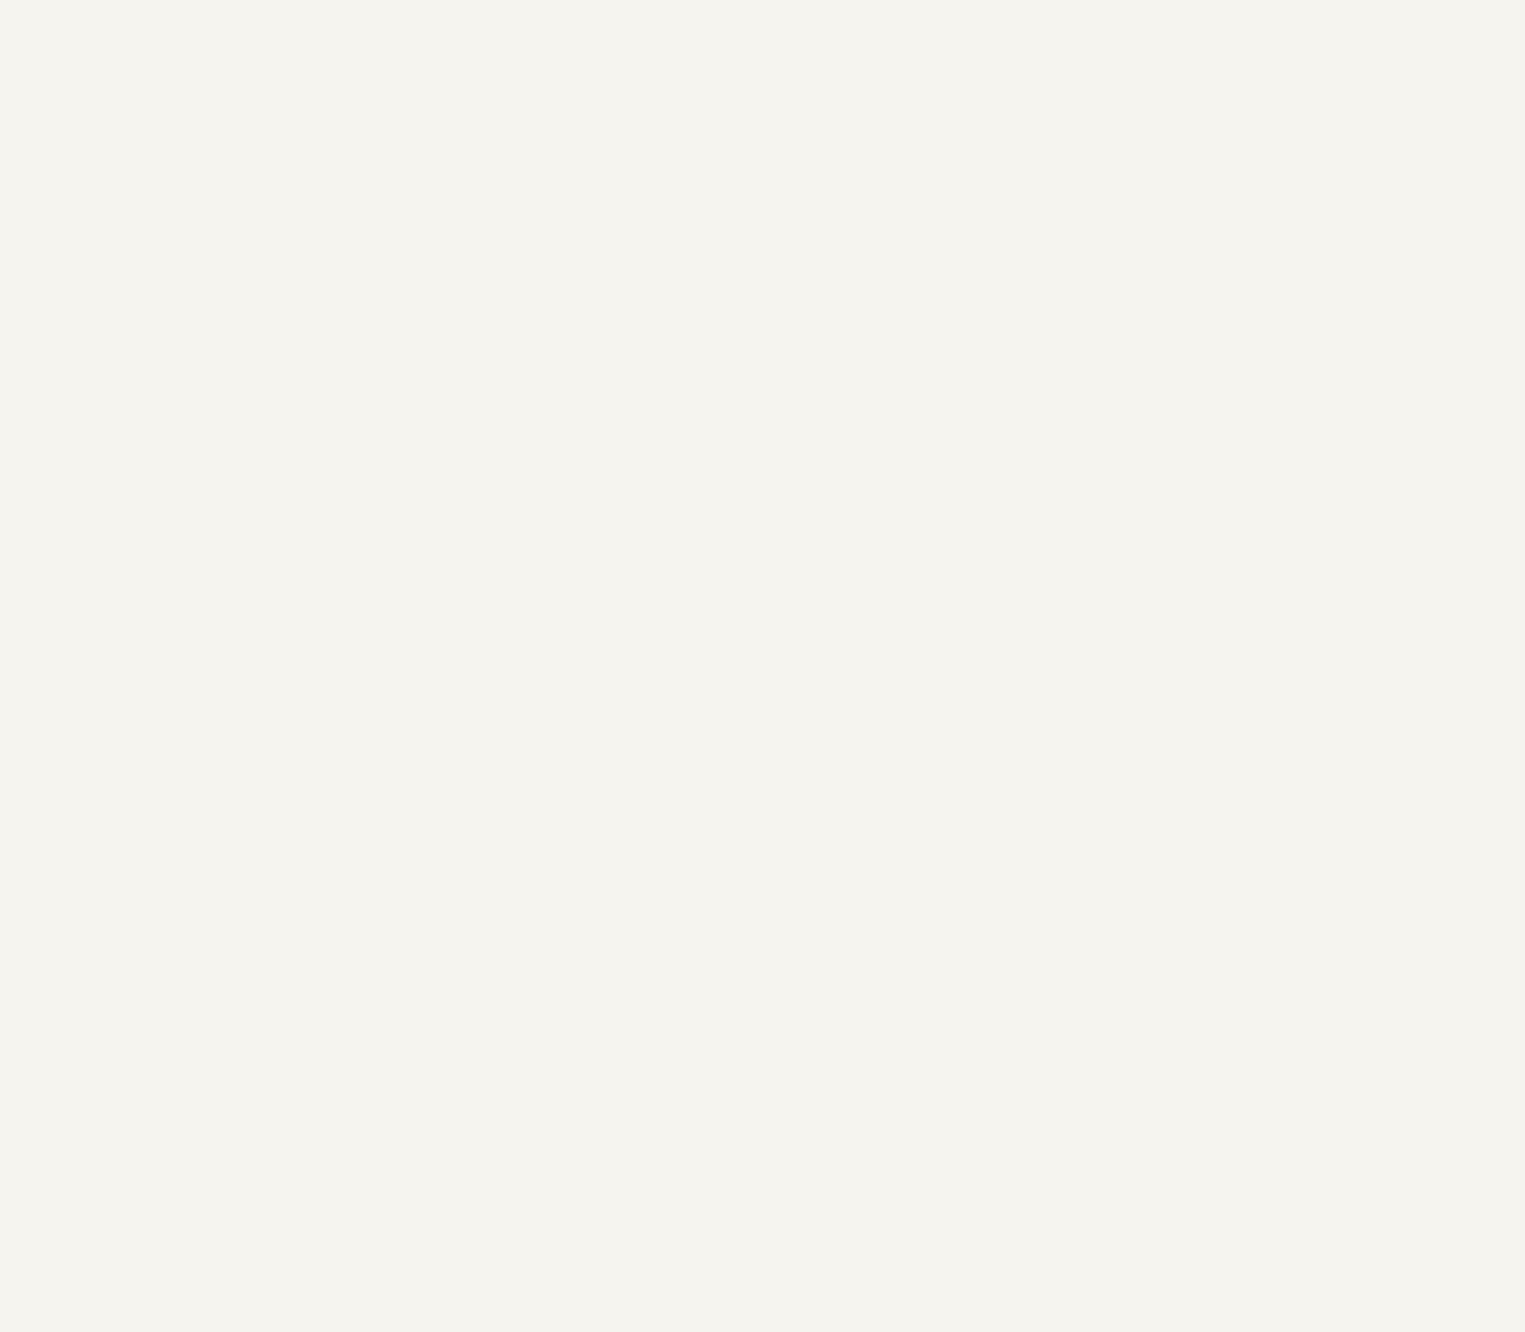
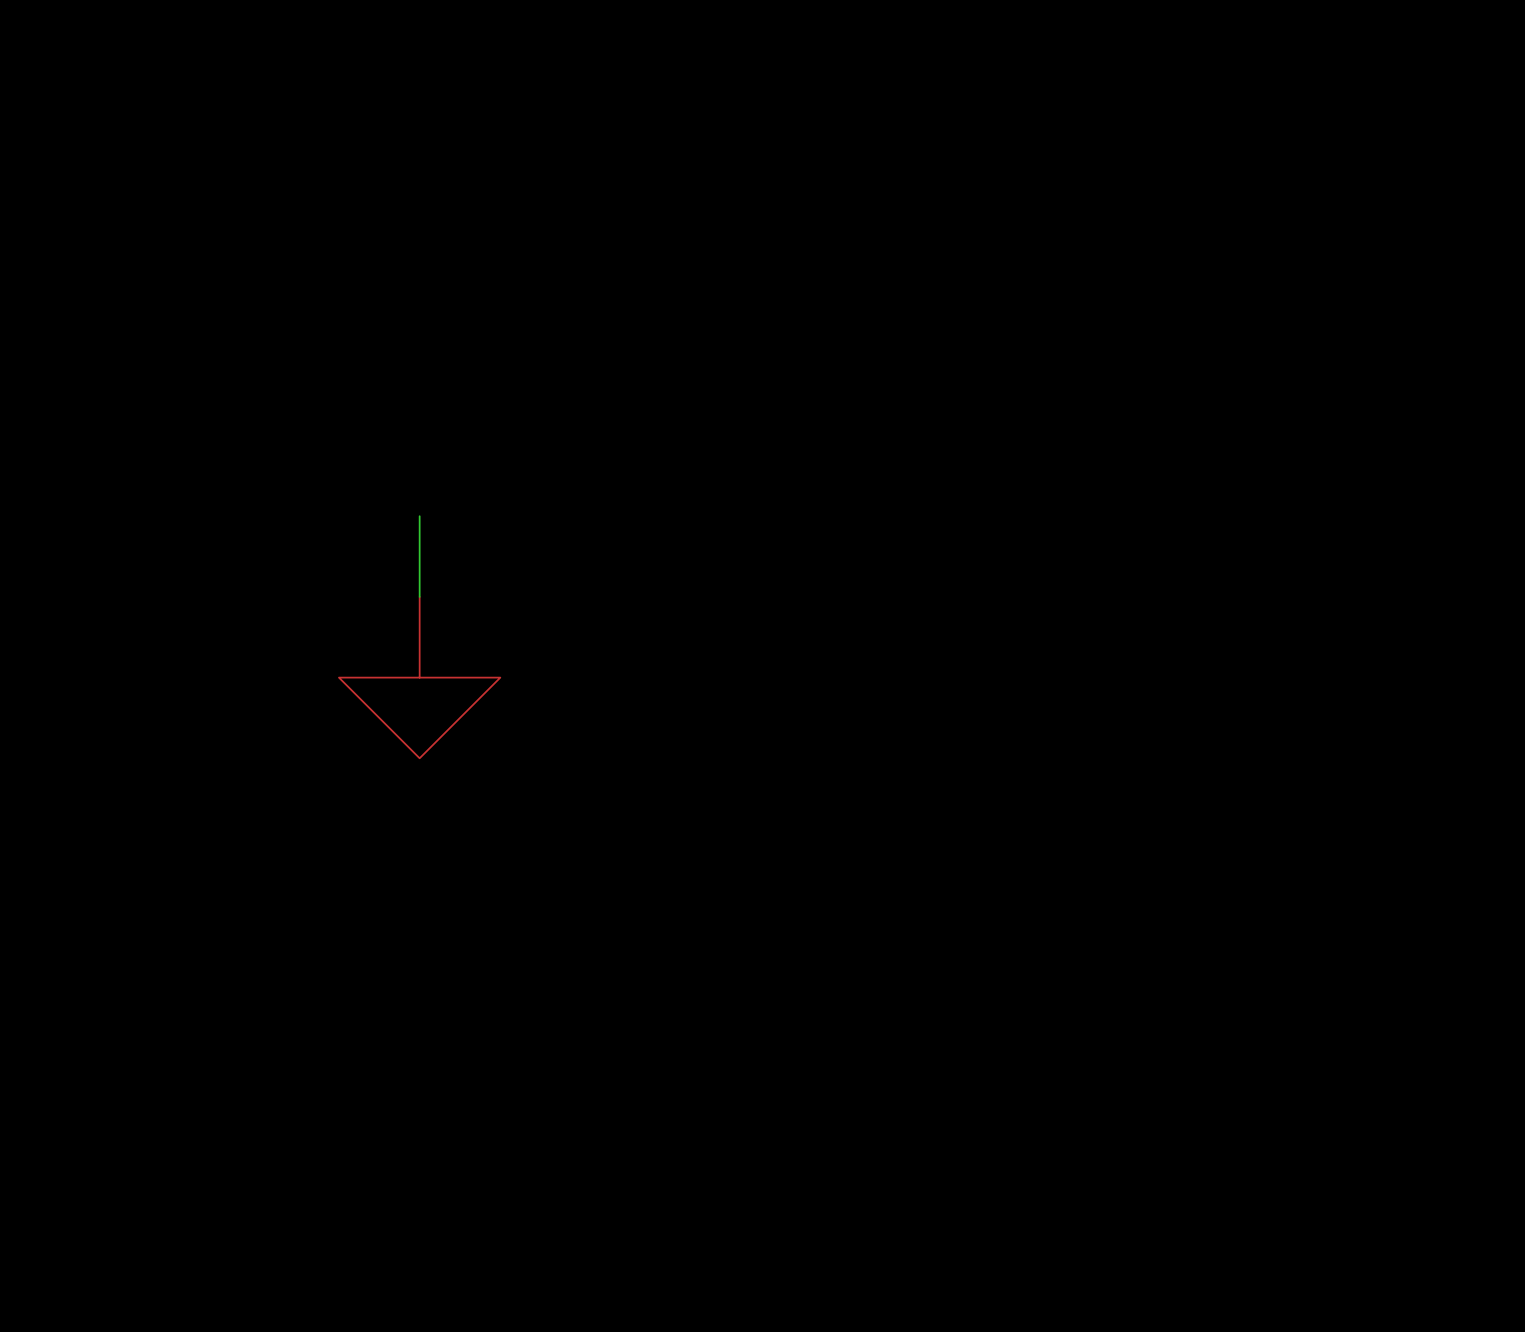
wire: none -> (419, 516) (419, 596)
power symbol: none -> (419, 677)

